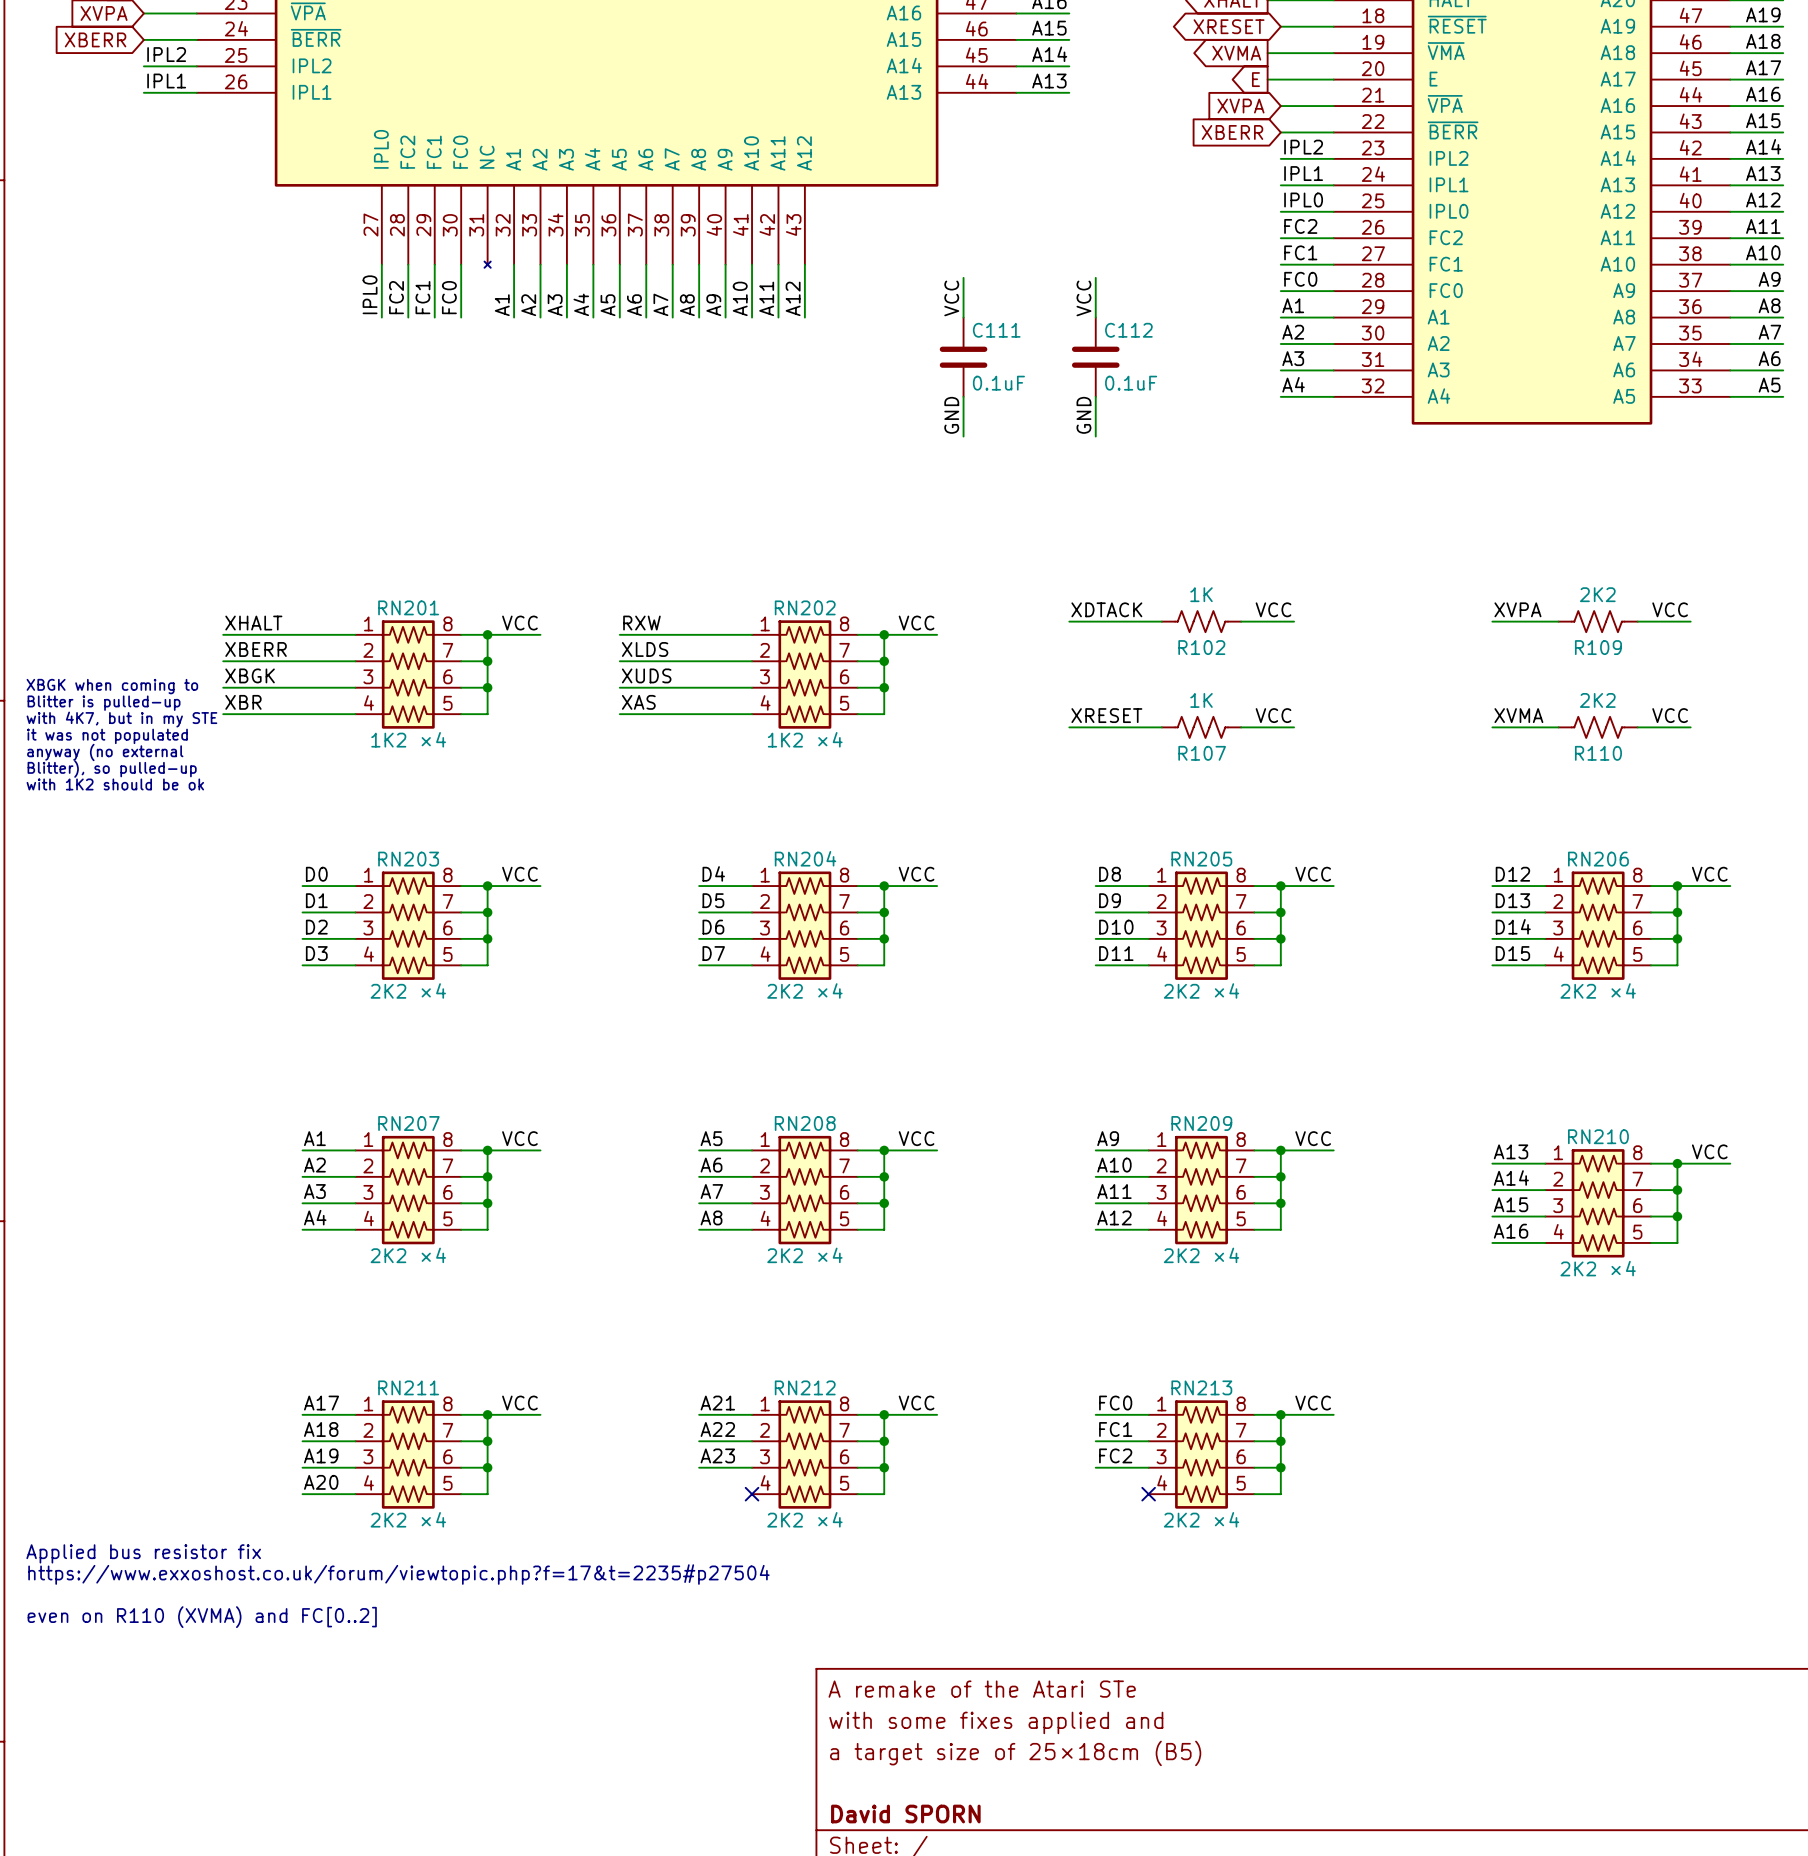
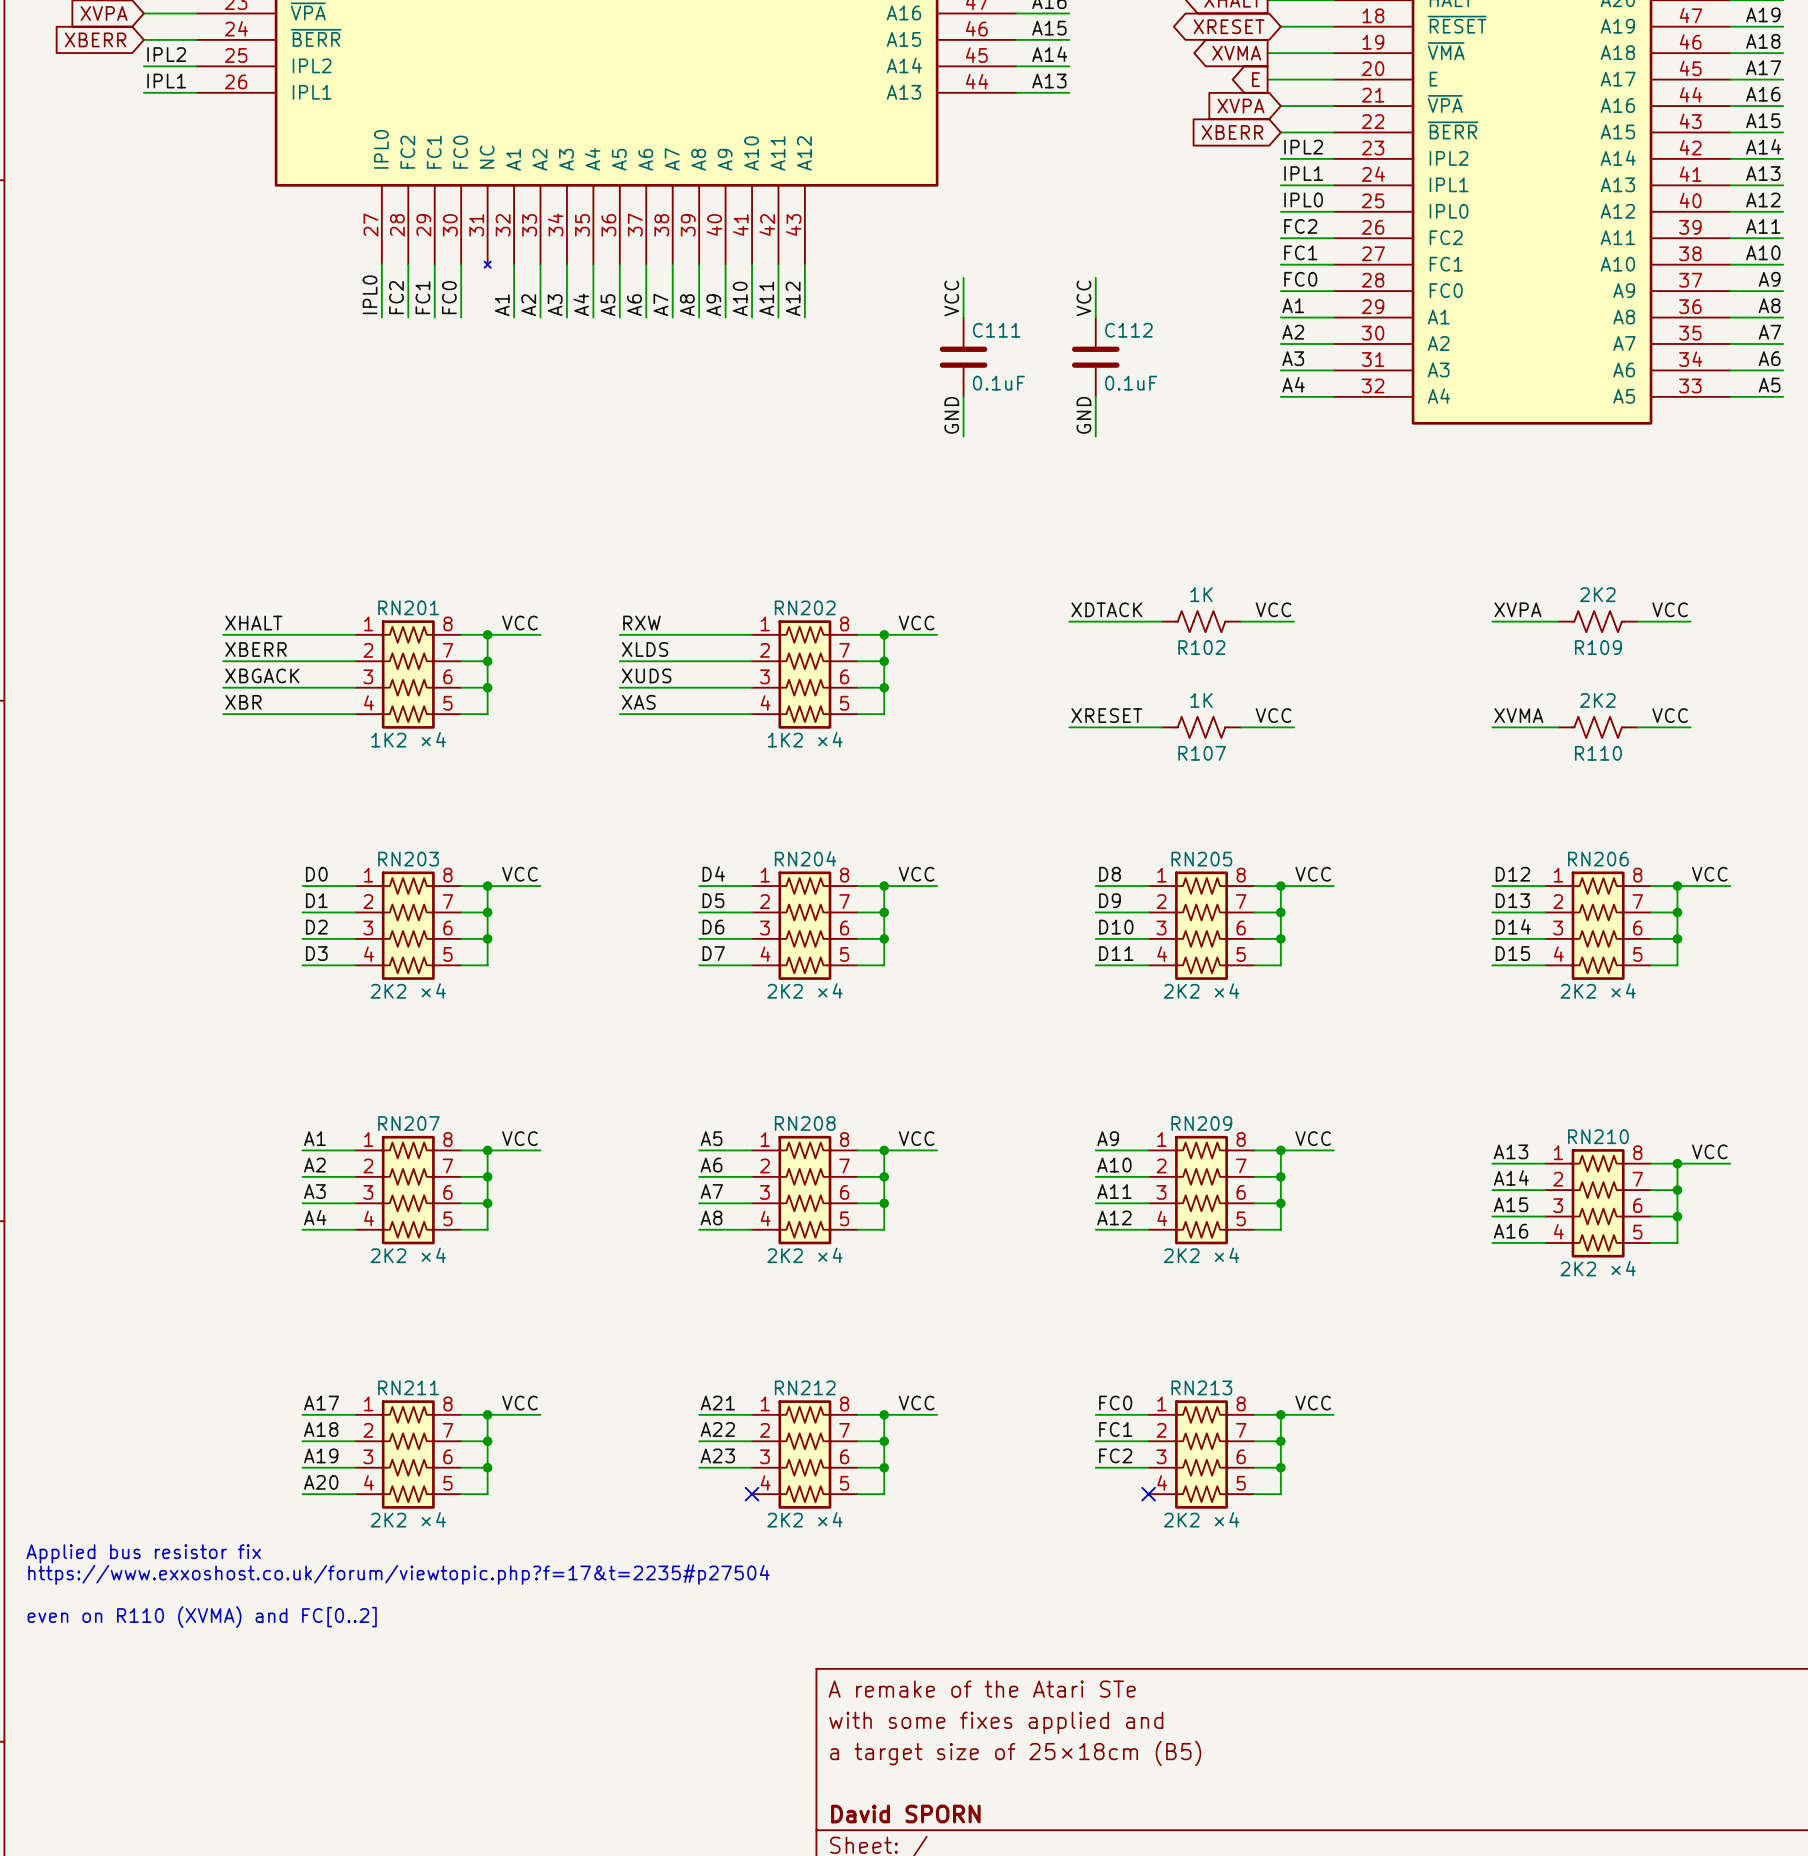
label: XBGK (250, 675) -> XBGACK (262, 675)
text: XBGK when coming to (112, 686) -> none
text: Blitter is pulled-up (104, 703) -> none
text: with 4K7, but in my STE (121, 719) -> none
text: it was not populated (107, 736) -> none
text: anyway (no external (105, 752) -> none
text: Blitter), so pulled-up (112, 769) -> none
text: with 1K2 should be ok (115, 784) -> none

